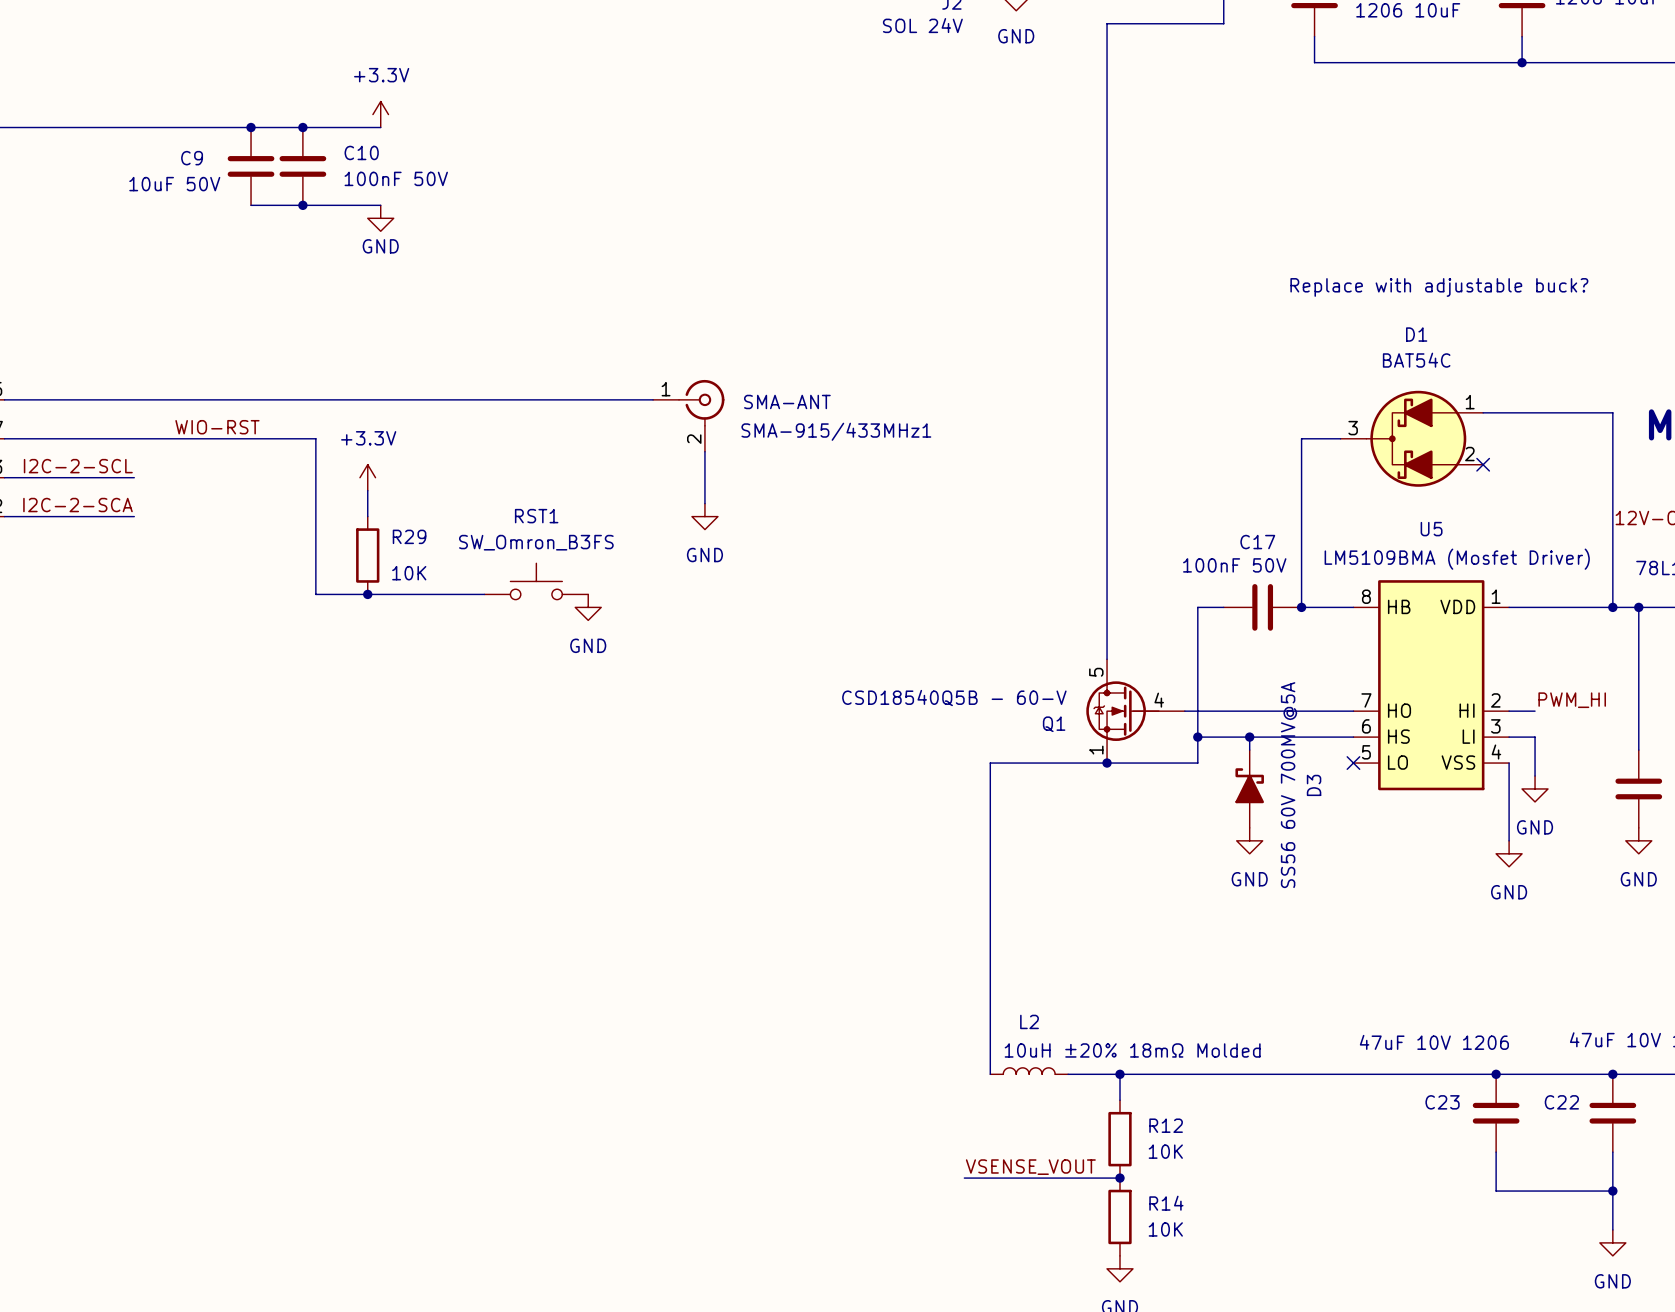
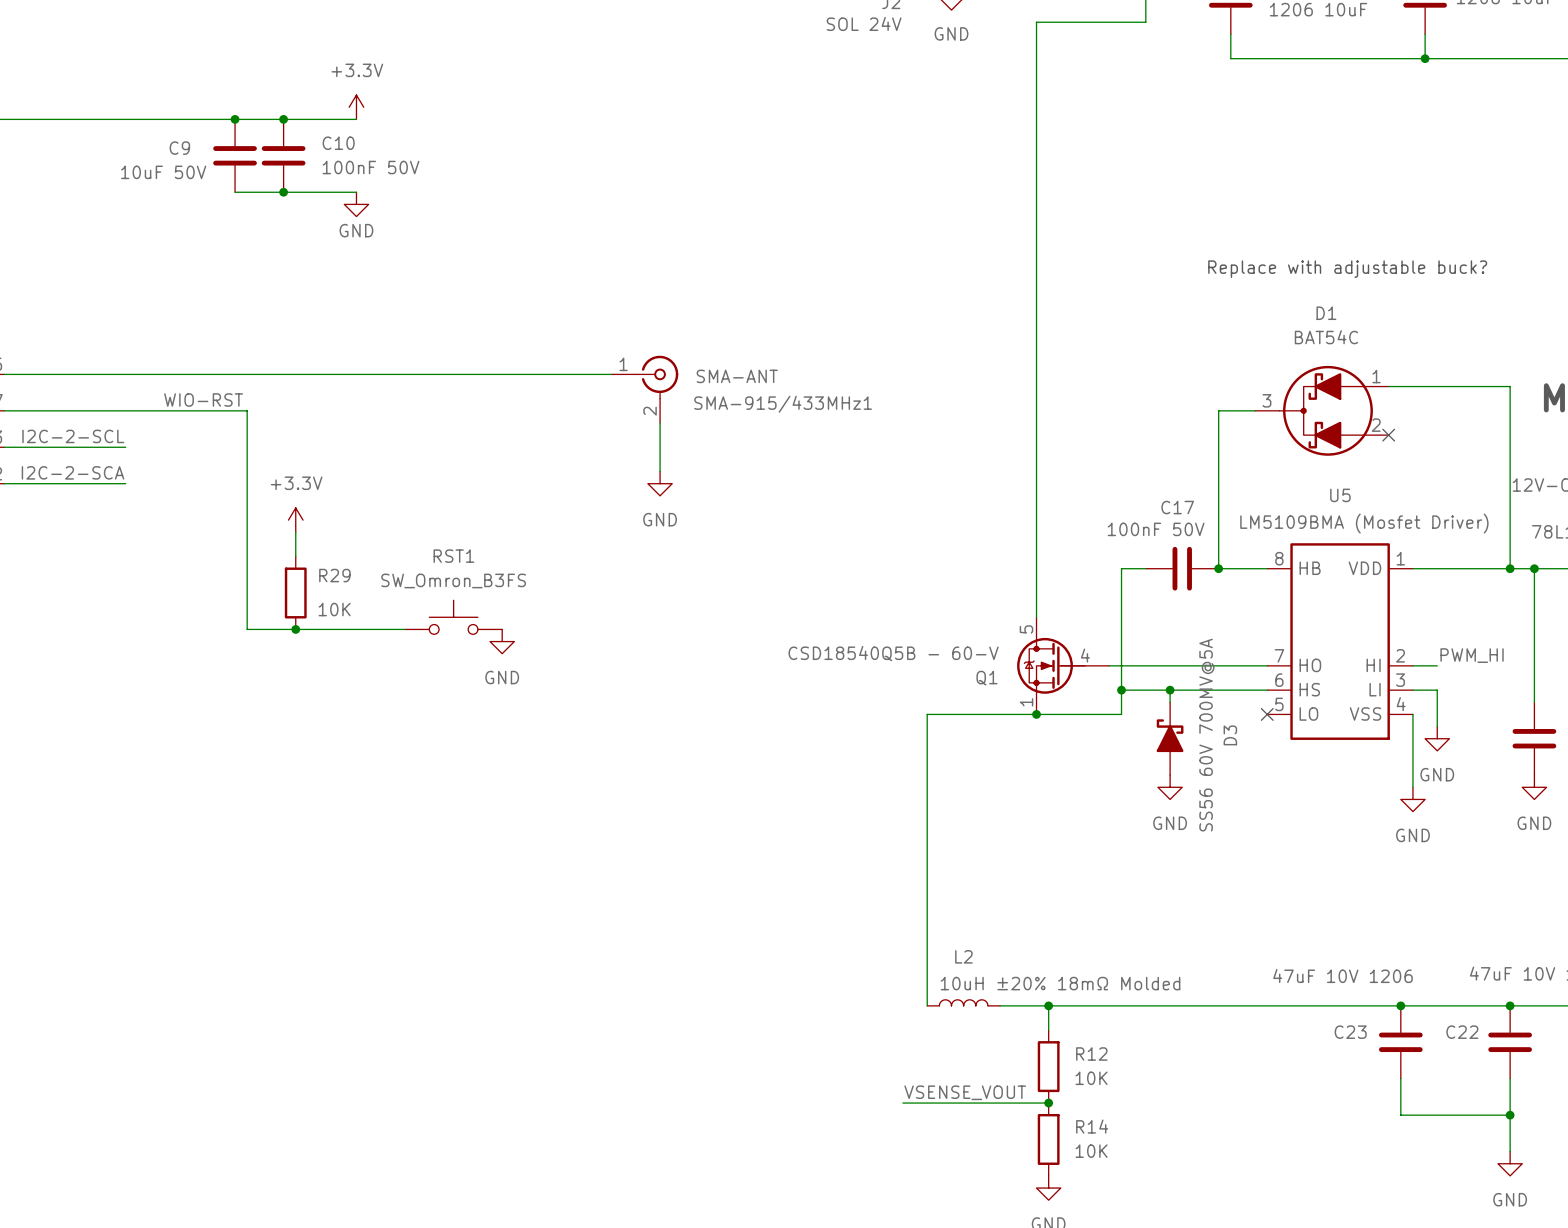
wire: (263, 438) (315, 438) (315, 568) -> (247, 410) (247, 629) (405, 629)
power symbol position: +3.3V (367, 477) -> +3.3V (295, 520)
wire: (367, 490) (367, 516) -> none
R29 position: (367, 555) -> (295, 592)
RST1 position: (536, 581) -> (453, 617)
wire: (315, 594) (484, 594) -> none
junction: (367, 594) -> none
power symbol position: GND (588, 607) -> GND (502, 641)
junction: none -> (295, 629)

